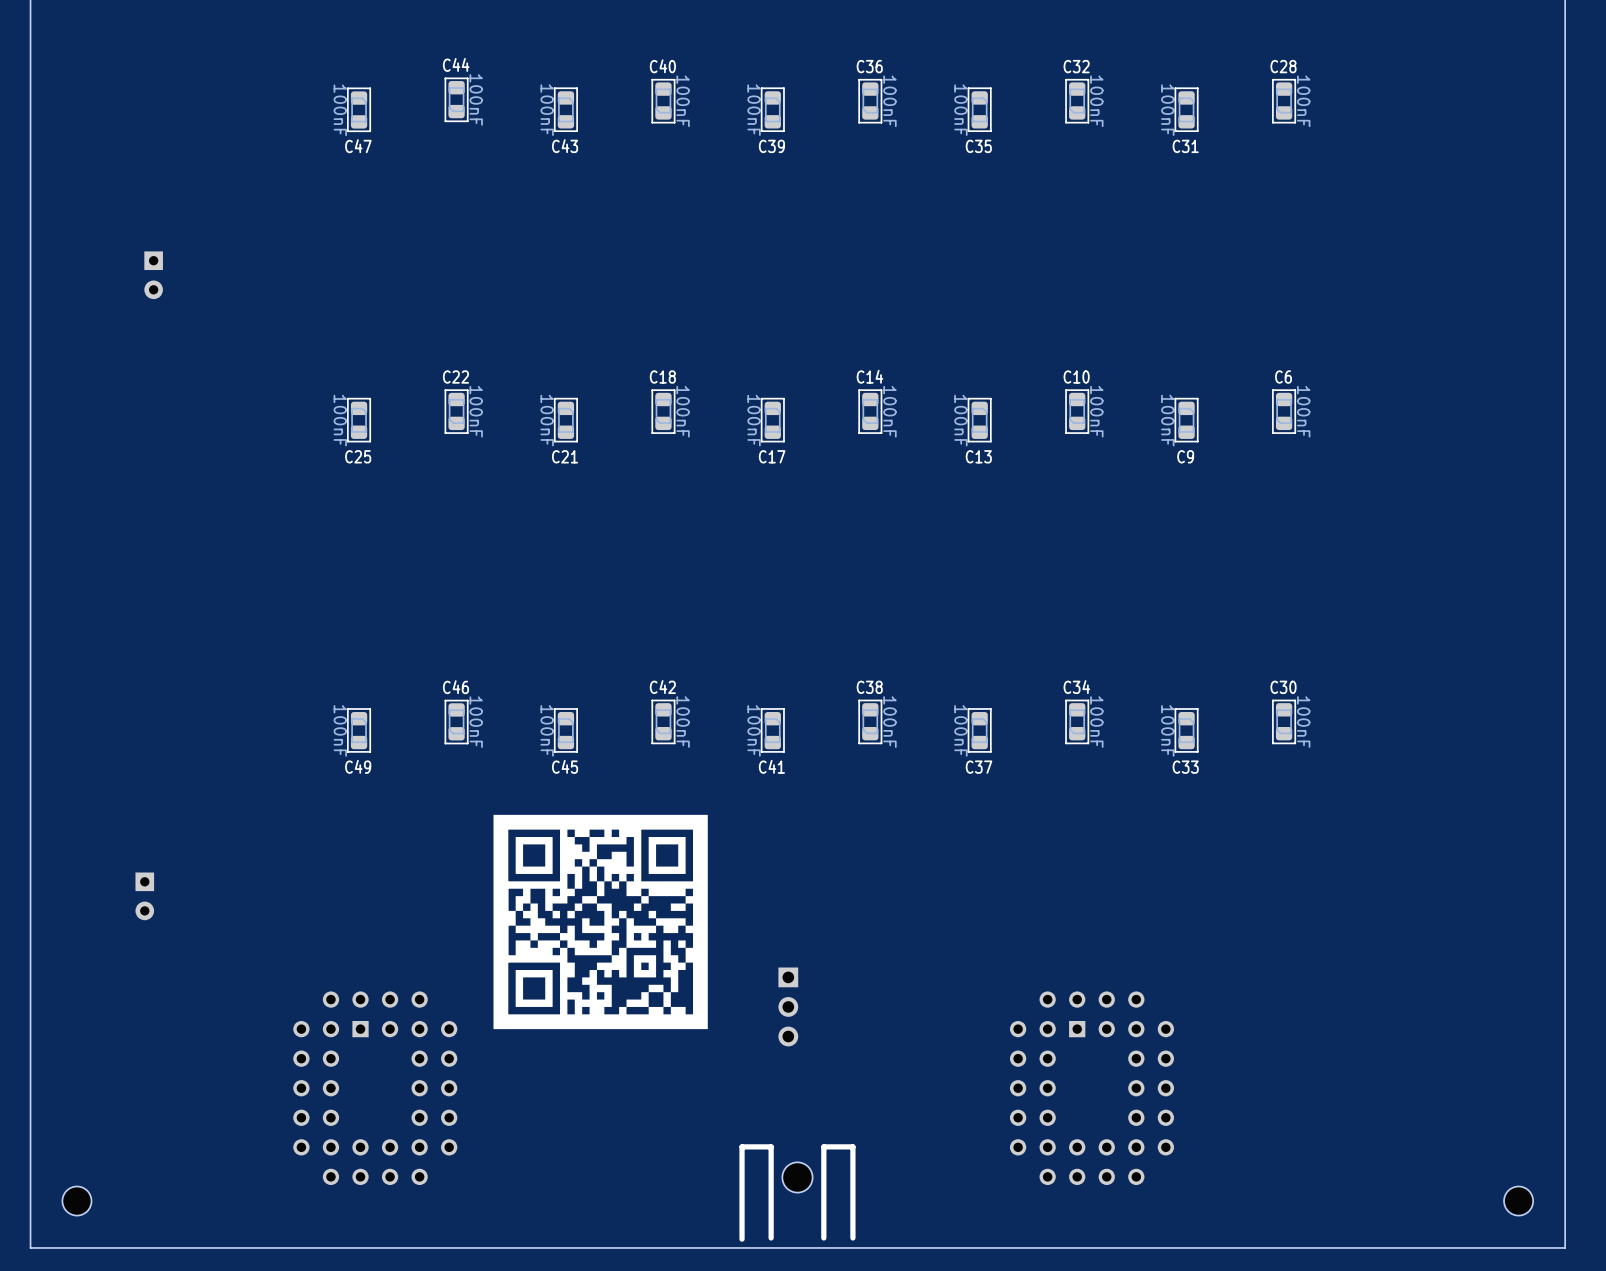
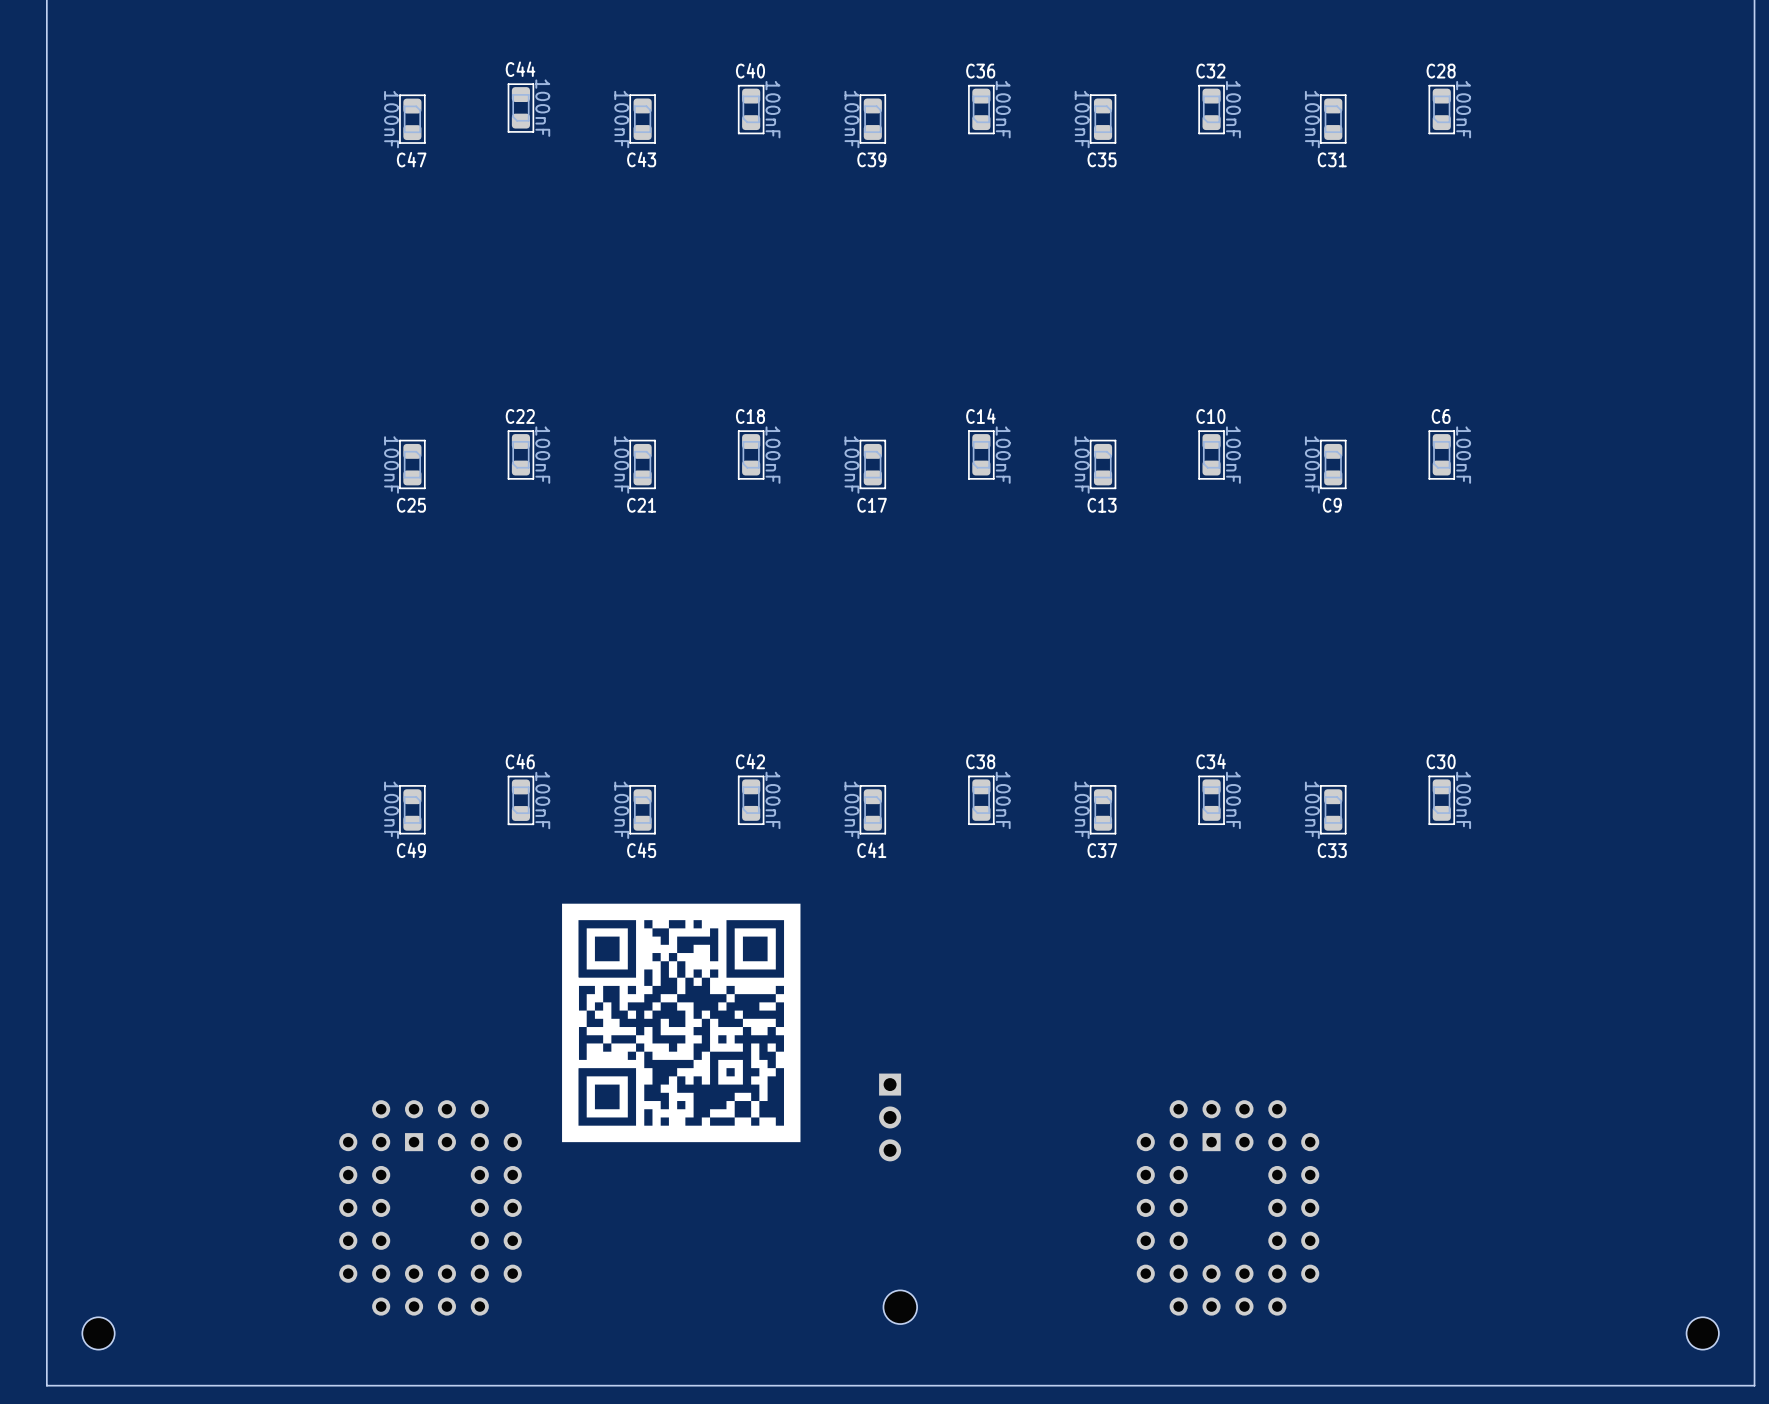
part: (153, 275) -> none
part: (144, 896) -> none
part: (797, 1193) -> none

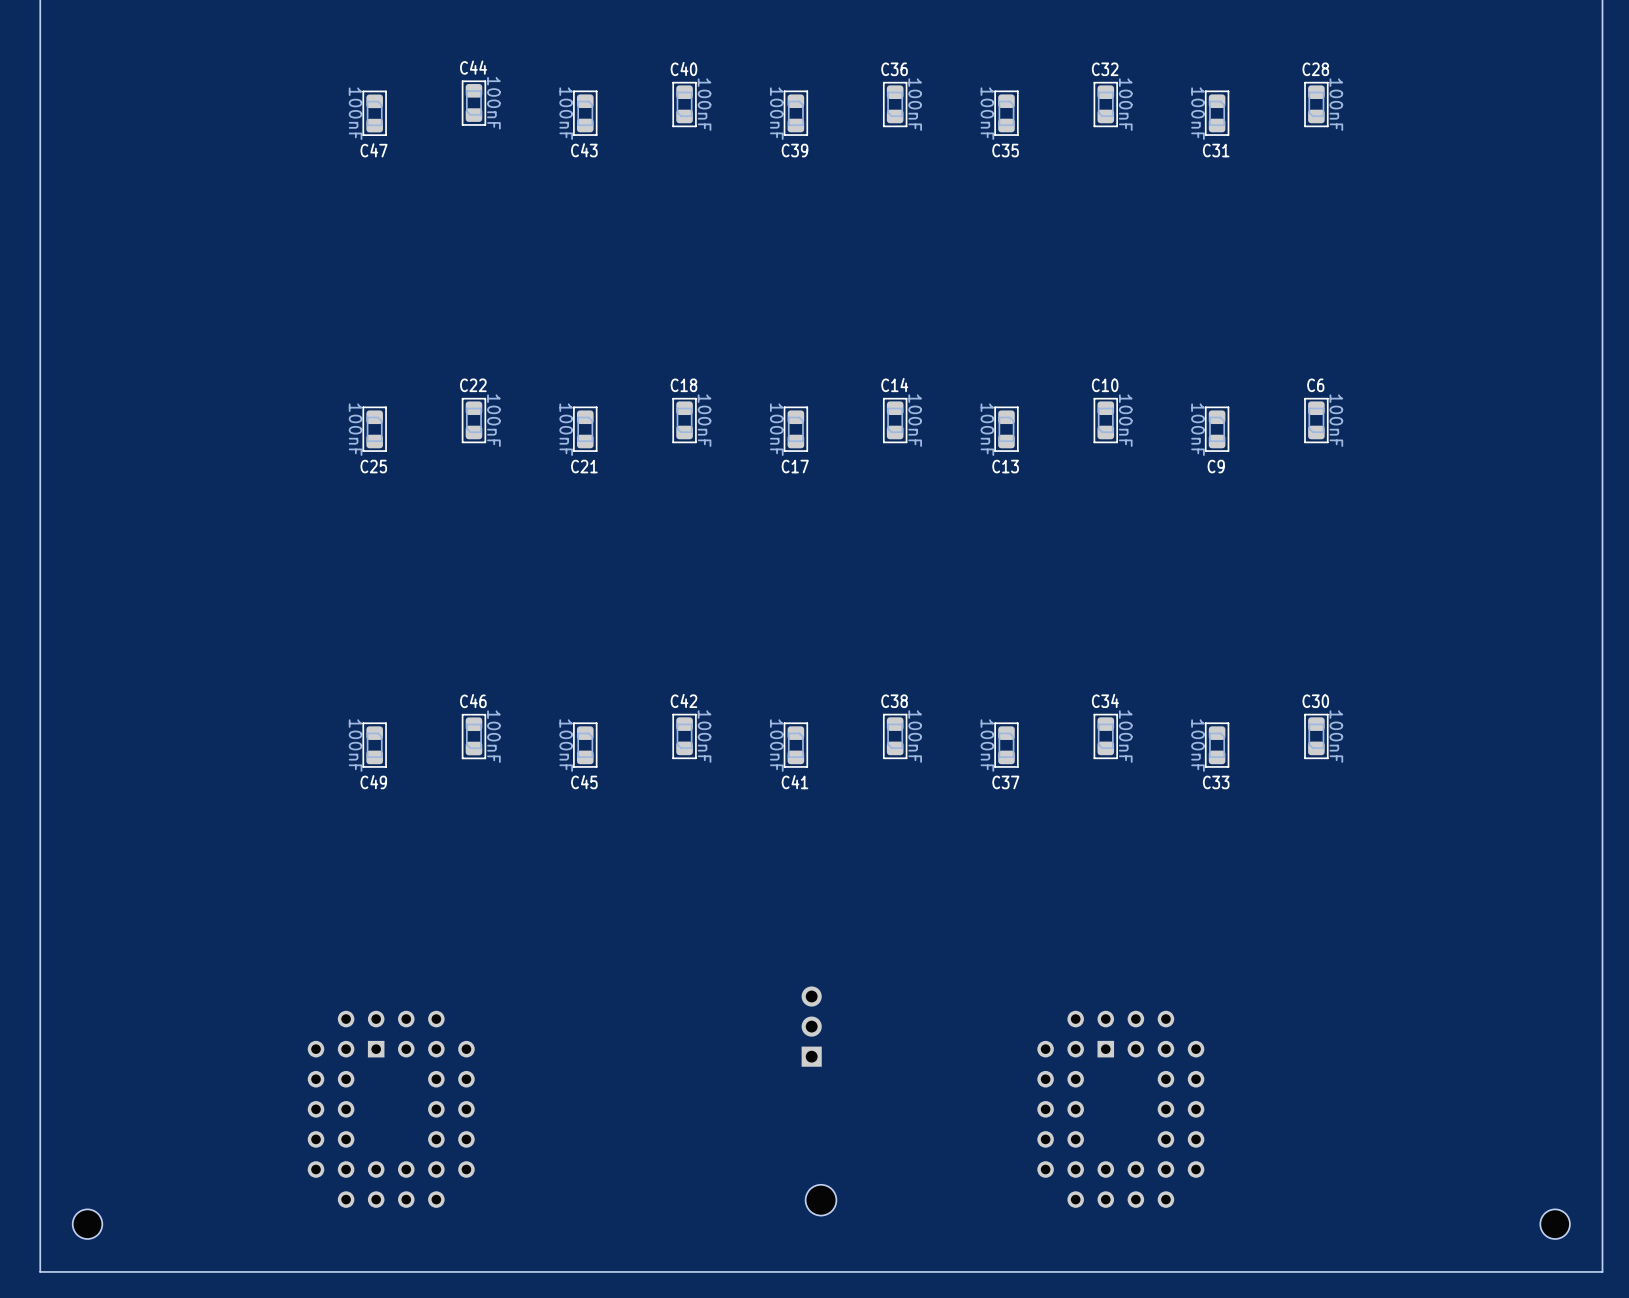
drawing: [562, 903, 801, 1143] -> none
part rotation: 0° (890, 1117) -> 180° (811, 1026)

